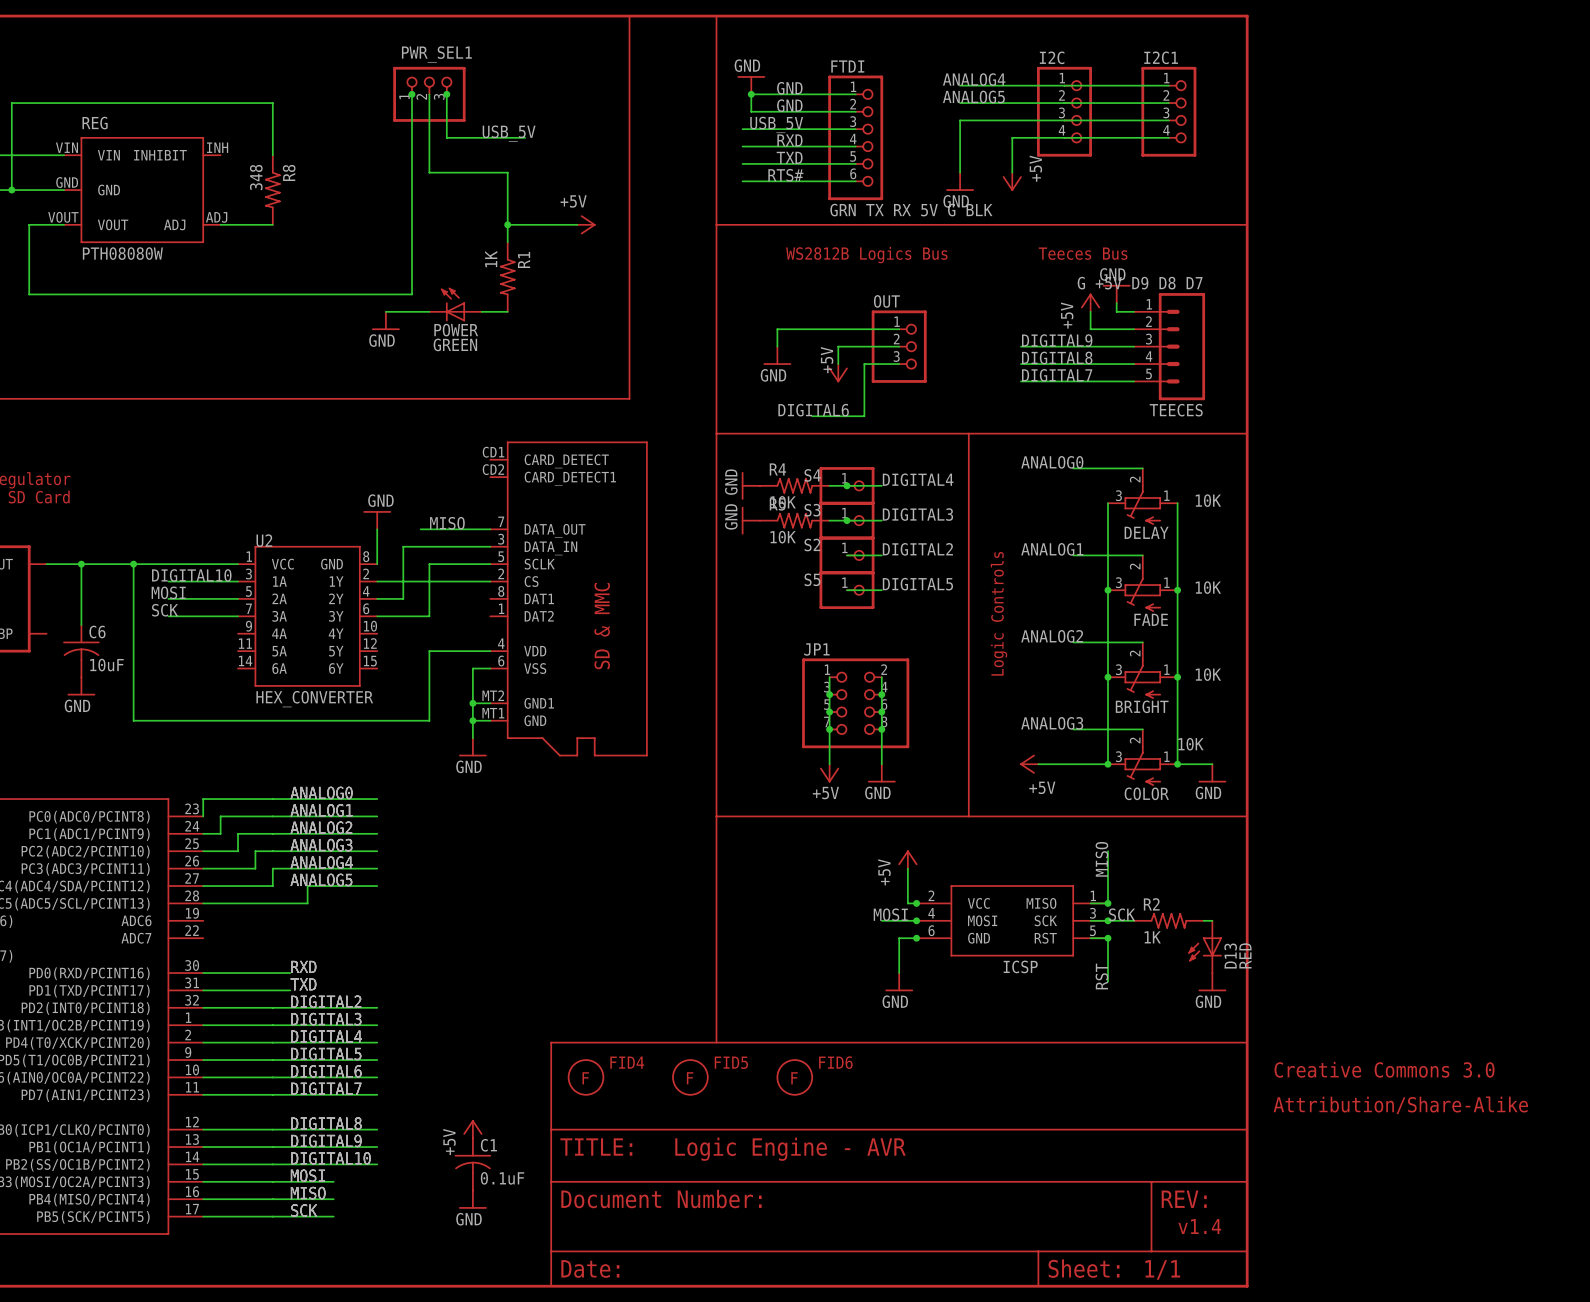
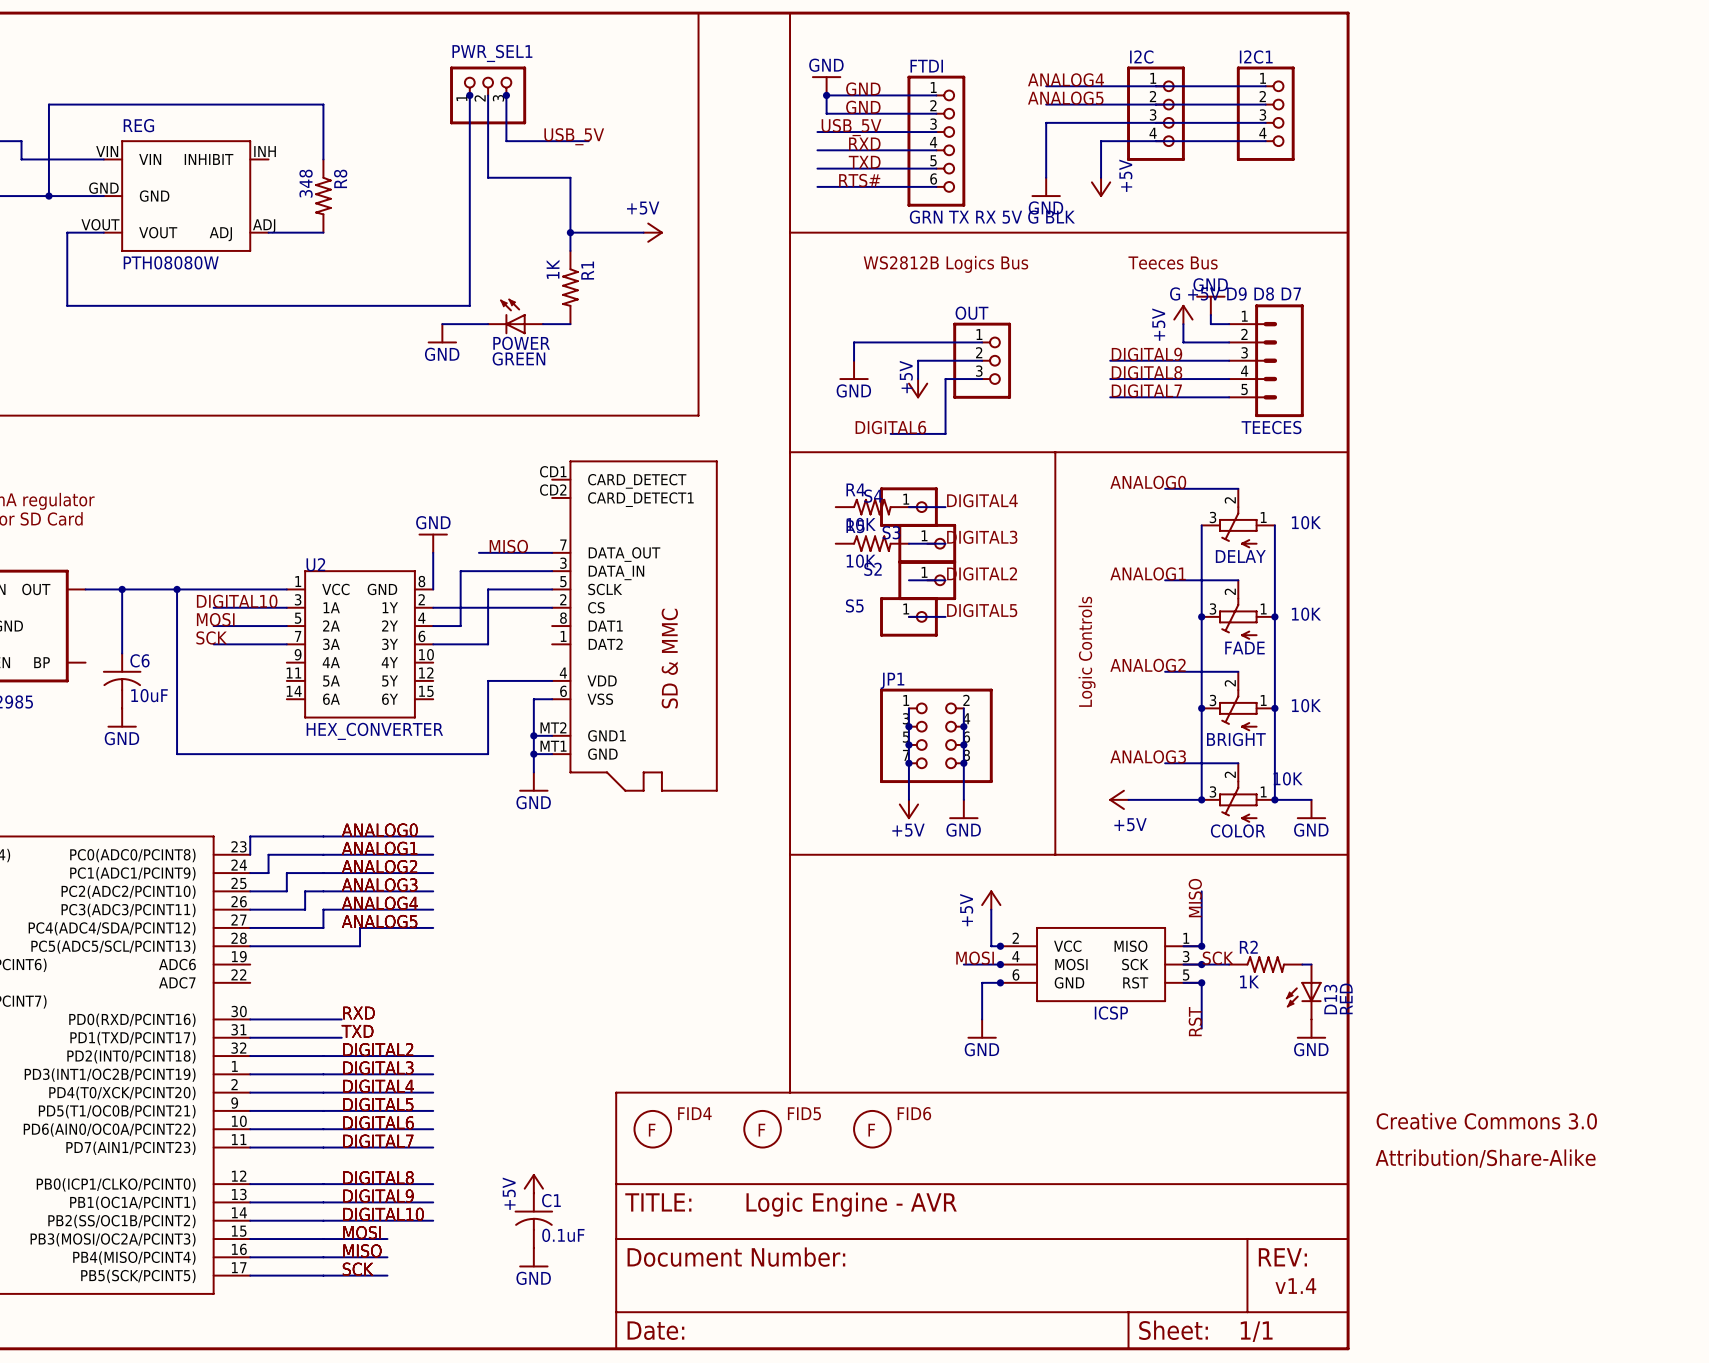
label position: DIGITAL4 (918, 479) -> DIGITAL4 (982, 500)
power symbol: GND (750, 485) -> none
S4 position: (846, 485) -> (908, 507)
junction: (846, 485) -> none
wire: (864, 485) (881, 485) -> none
label position: DIGITAL3 (917, 514) -> DIGITAL3 (982, 537)
power symbol: GND (750, 520) -> none
junction: (846, 520) -> none
wire: (864, 520) (881, 520) -> none
S2 name position: S2 (812, 545) -> S2 (872, 569)
label position: DIGITAL2 (917, 549) -> DIGITAL2 (982, 573)
wire: (864, 555) (881, 555) -> (908, 580) (927, 580)
S5 name position: S5 (812, 579) -> S5 (854, 605)
label position: DIGITAL5 (917, 584) -> DIGITAL5 (982, 610)
S5 position: (846, 590) -> (908, 616)
wire: (864, 590) (881, 590) -> (908, 616) (927, 616)

